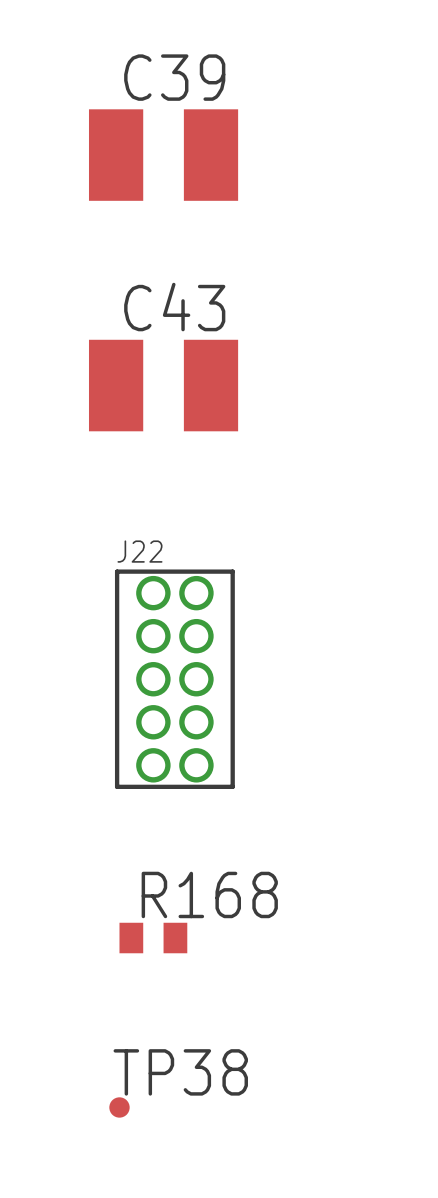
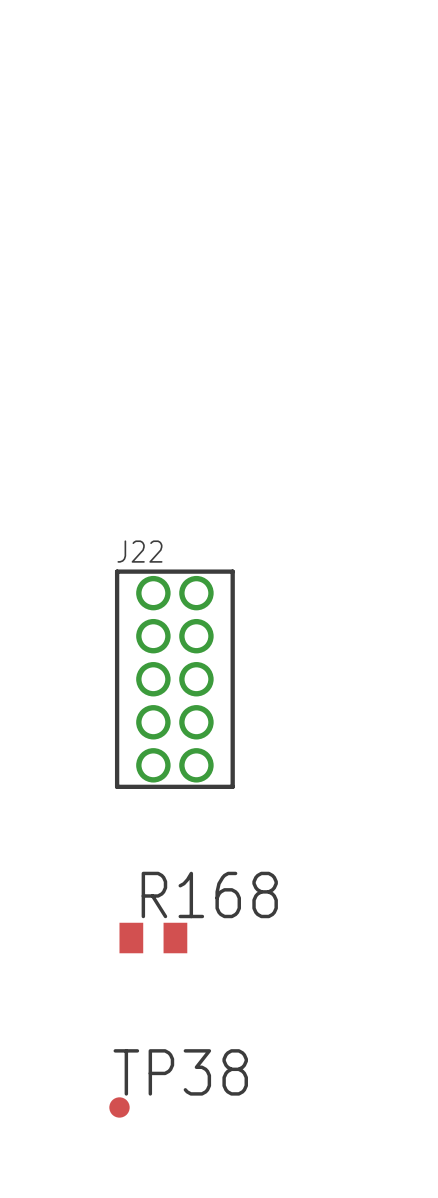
C39: (163, 155) -> none
C43: (163, 385) -> none

